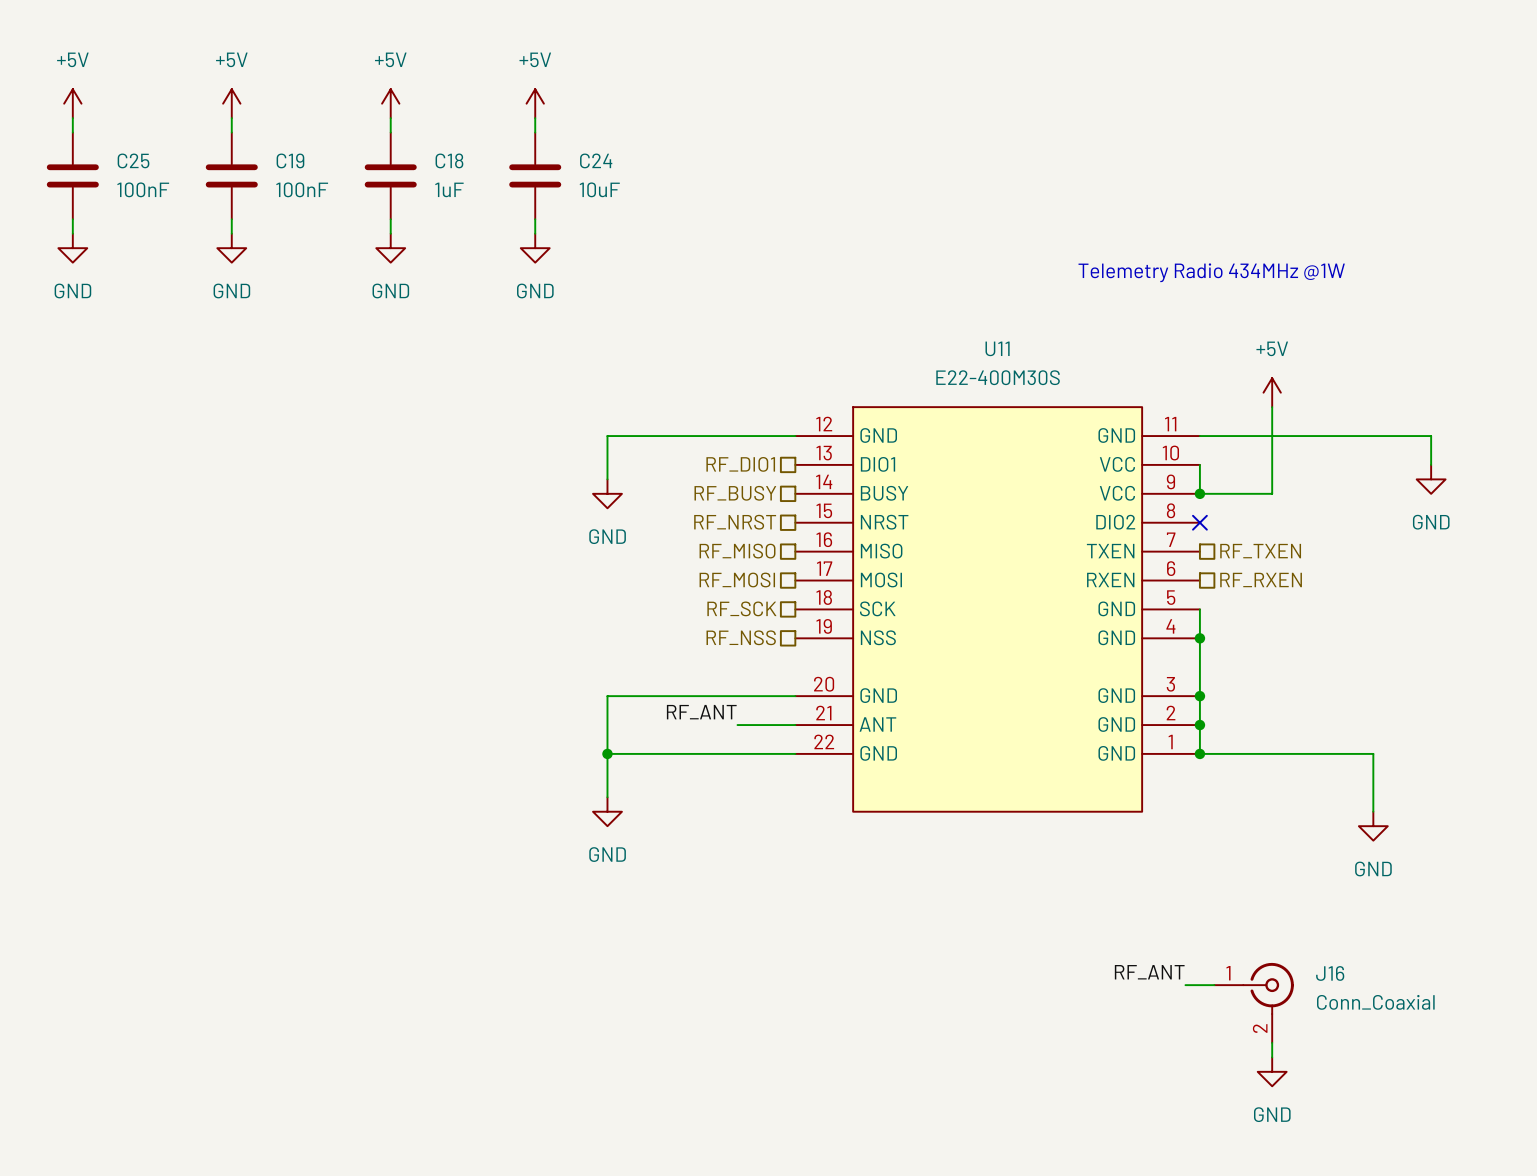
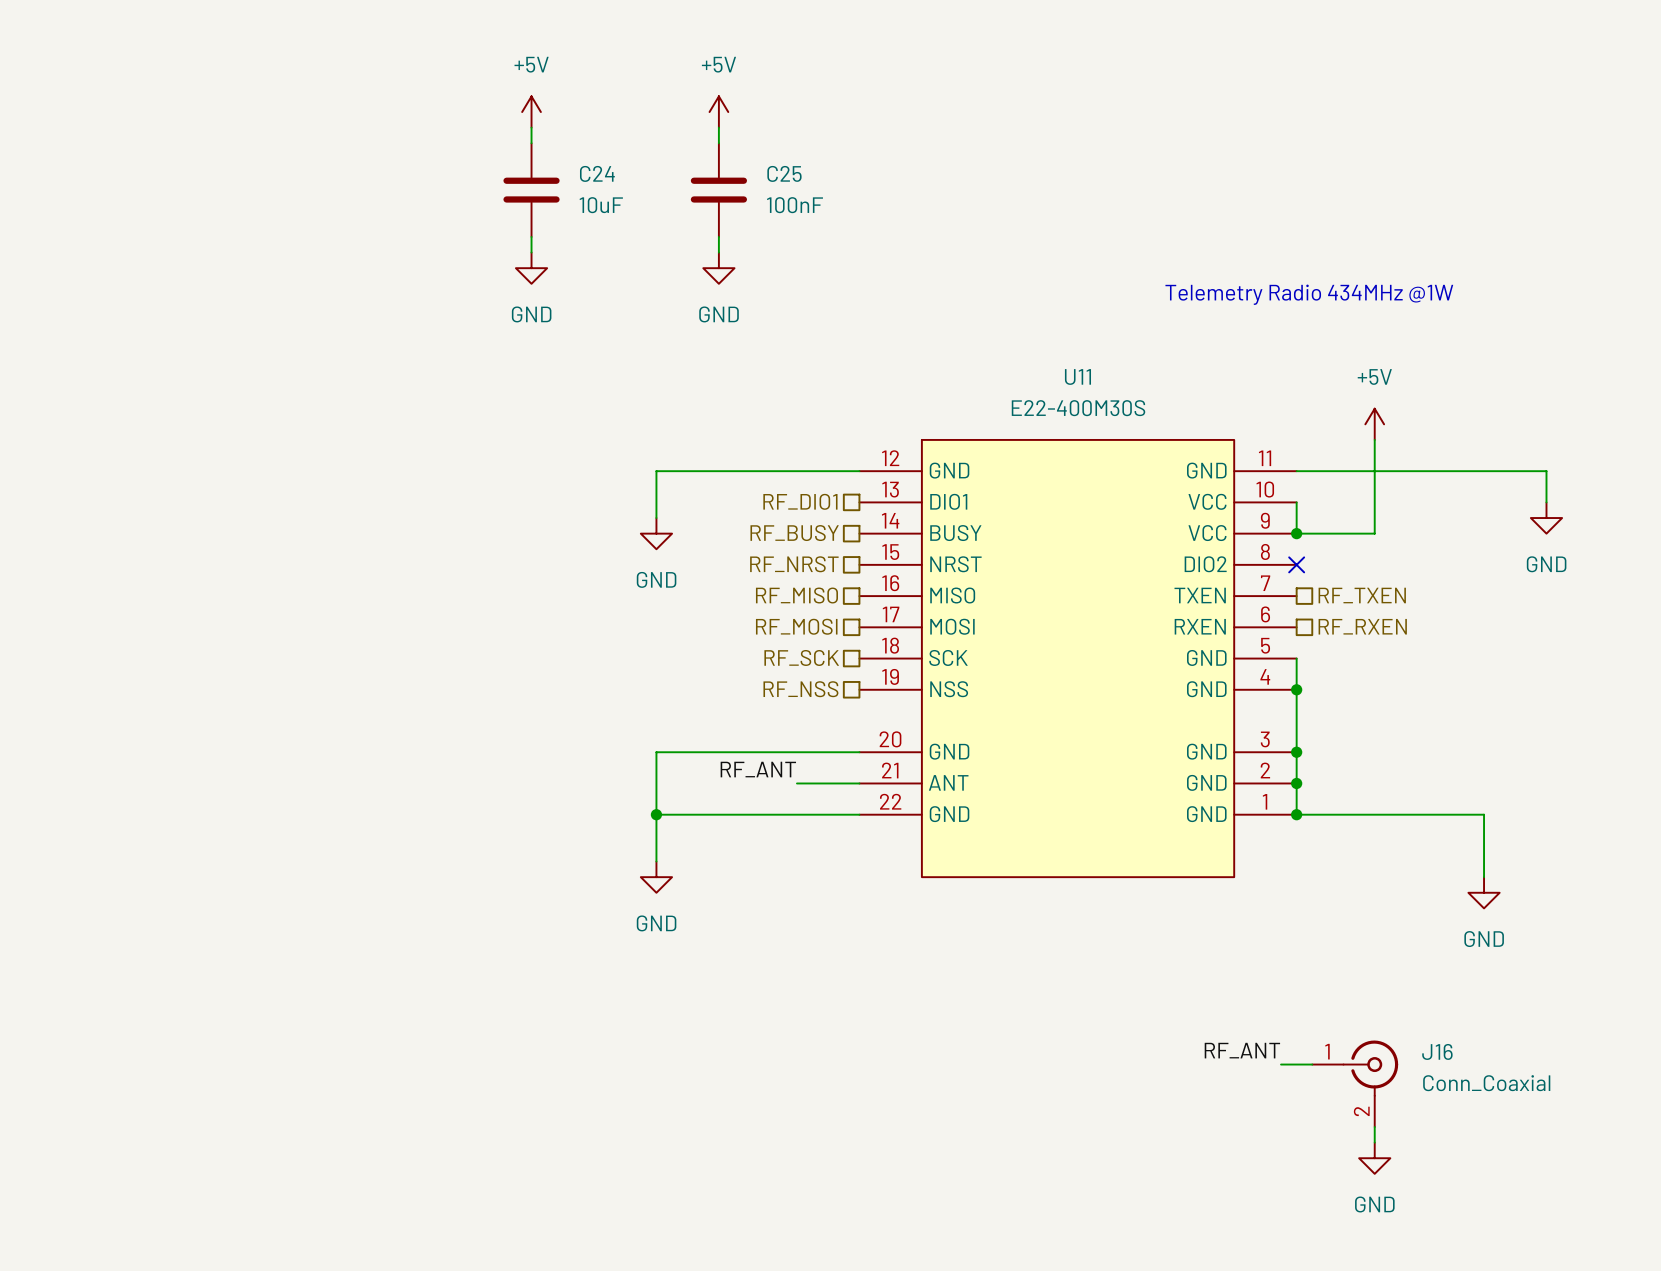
power symbol: +5V (72, 103) -> none
power symbol: +5V (231, 103) -> none
power symbol: +5V (390, 103) -> none
power symbol position: +5V (535, 103) -> +5V (531, 112)
power symbol: none -> +5V (718, 112)
wire: (72, 118) (72, 132) -> none
wire: (231, 118) (231, 132) -> none
wire: (390, 118) (390, 132) -> (718, 127) (718, 143)
wire: (535, 118) (535, 132) -> (531, 127) (531, 143)
C25 position: (72, 175) -> (718, 190)
C19: 100nF (231, 175) -> none
C18: 1uF (390, 175) -> none
C24 position: (535, 175) -> (531, 190)
wire: (72, 219) (72, 233) -> none
wire: (231, 219) (231, 233) -> none
wire: (390, 219) (390, 233) -> (718, 236) (718, 252)
wire: (535, 219) (535, 233) -> (531, 236) (531, 252)
power symbol: GND (72, 248) -> none
power symbol: GND (231, 248) -> none
power symbol: GND (390, 248) -> none
power symbol position: GND (535, 248) -> GND (531, 268)
power symbol: none -> GND (718, 268)

